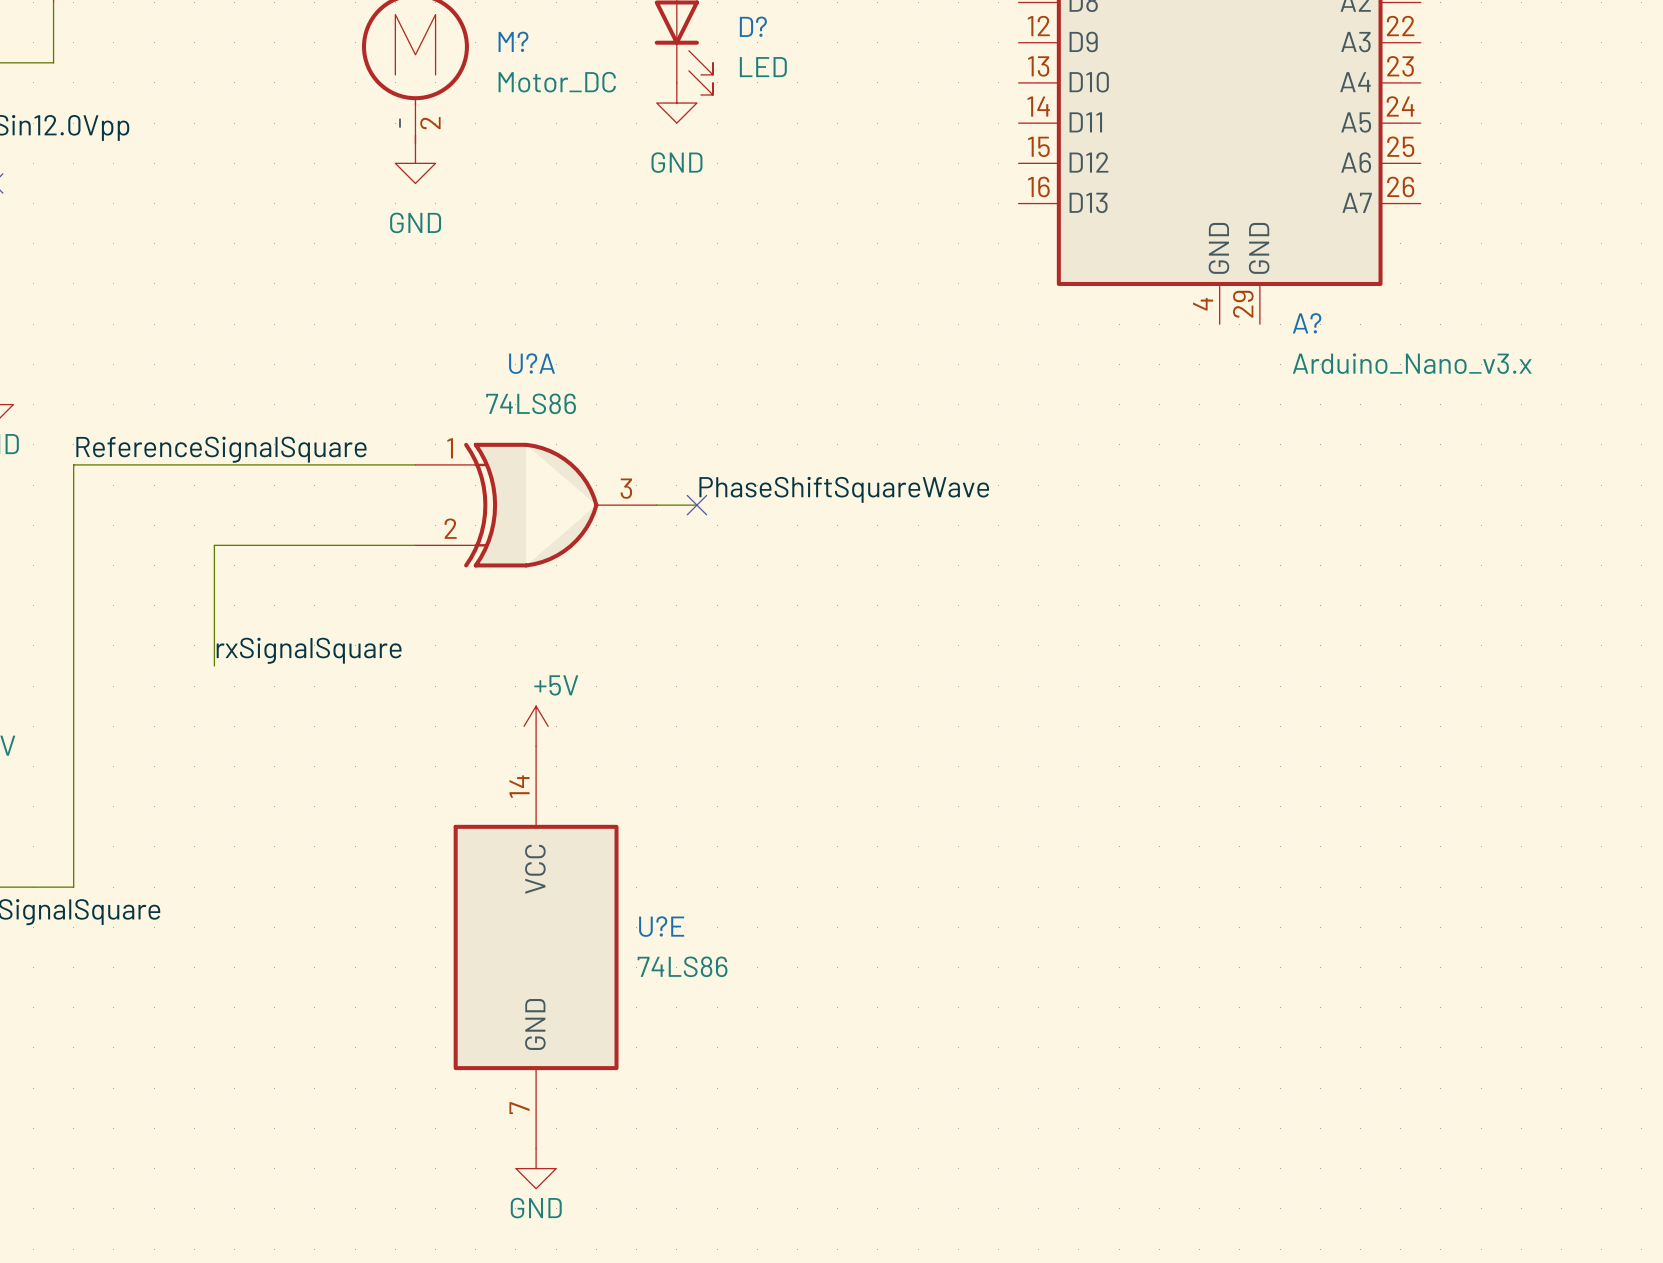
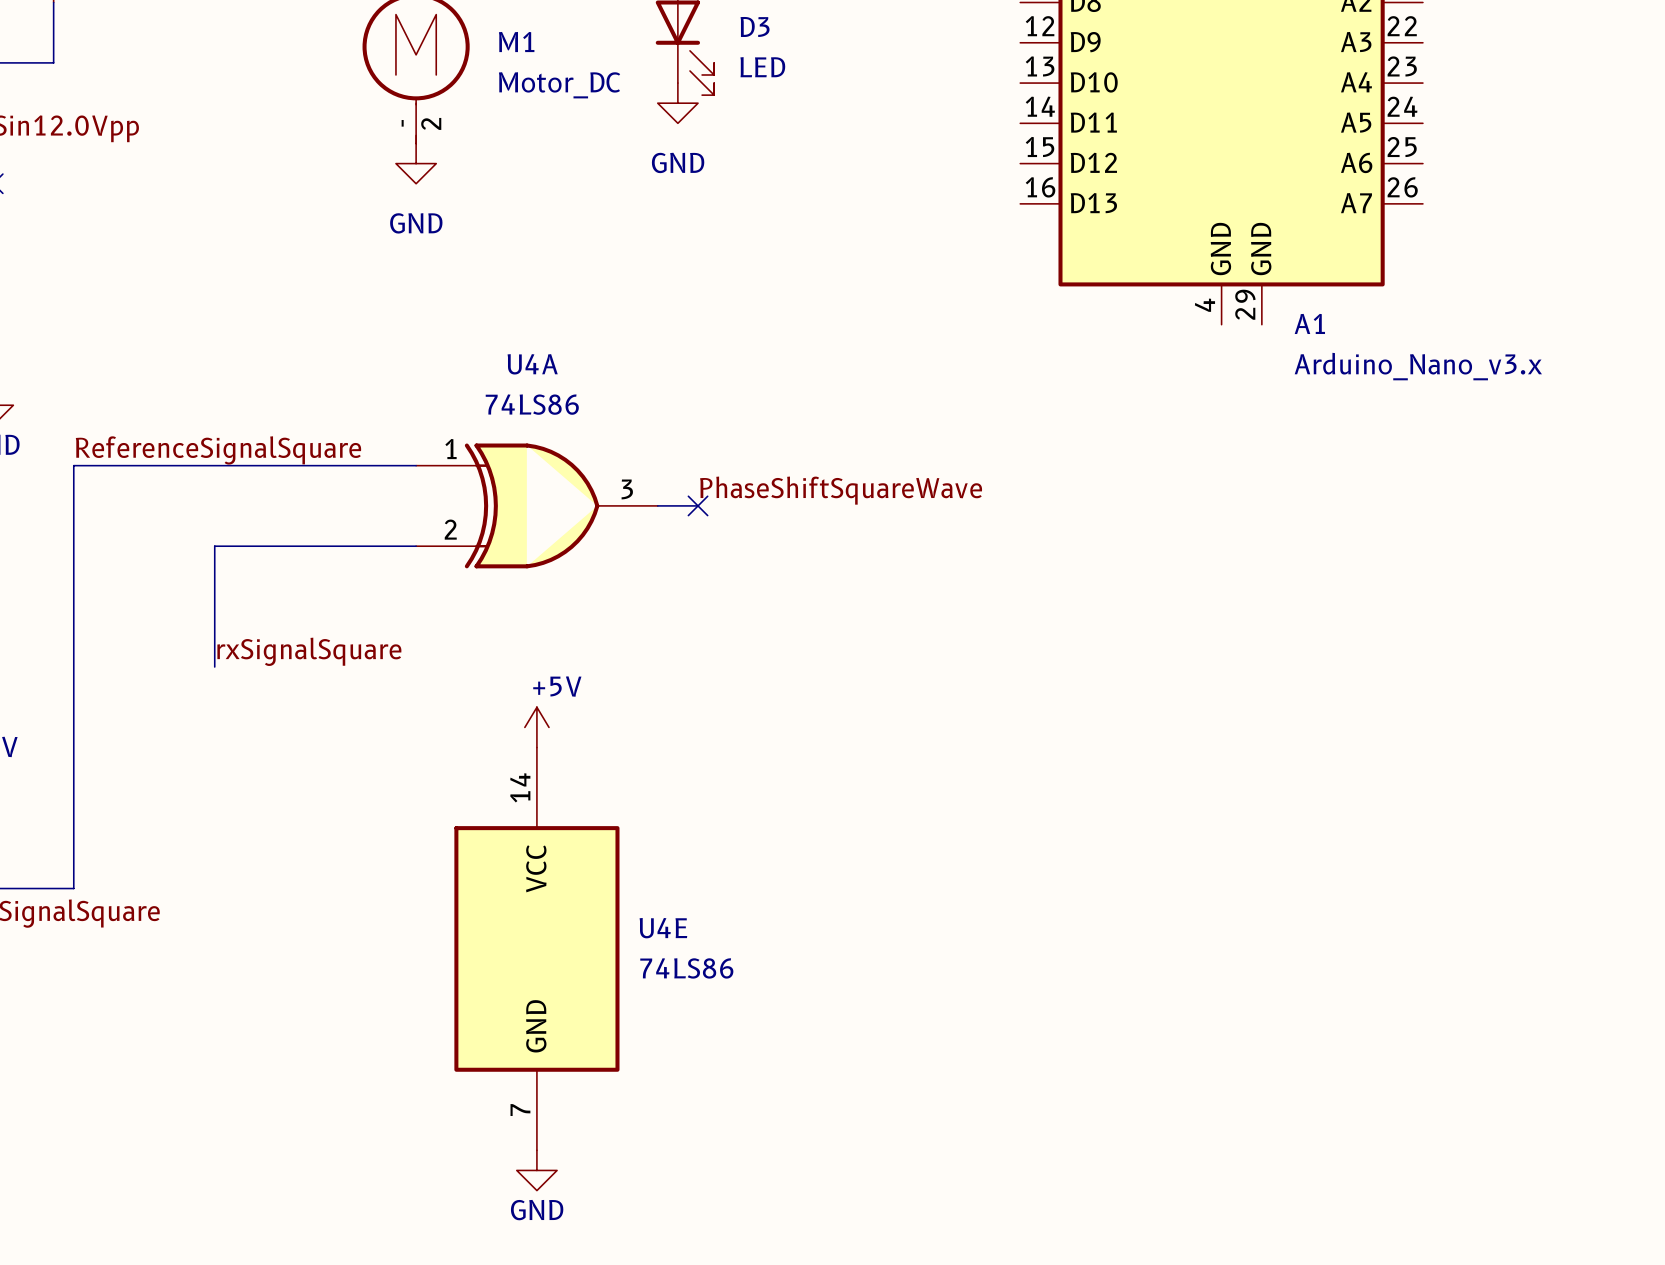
D? name: D? (753, 26) -> D3 (755, 26)
M? name: M? (513, 41) -> M1 (516, 42)
A? name: A? (1307, 323) -> A1 (1309, 323)
U?A name: U?A (532, 363) -> U4A (532, 364)
U?E name: U?E (661, 926) -> U4E (663, 928)

